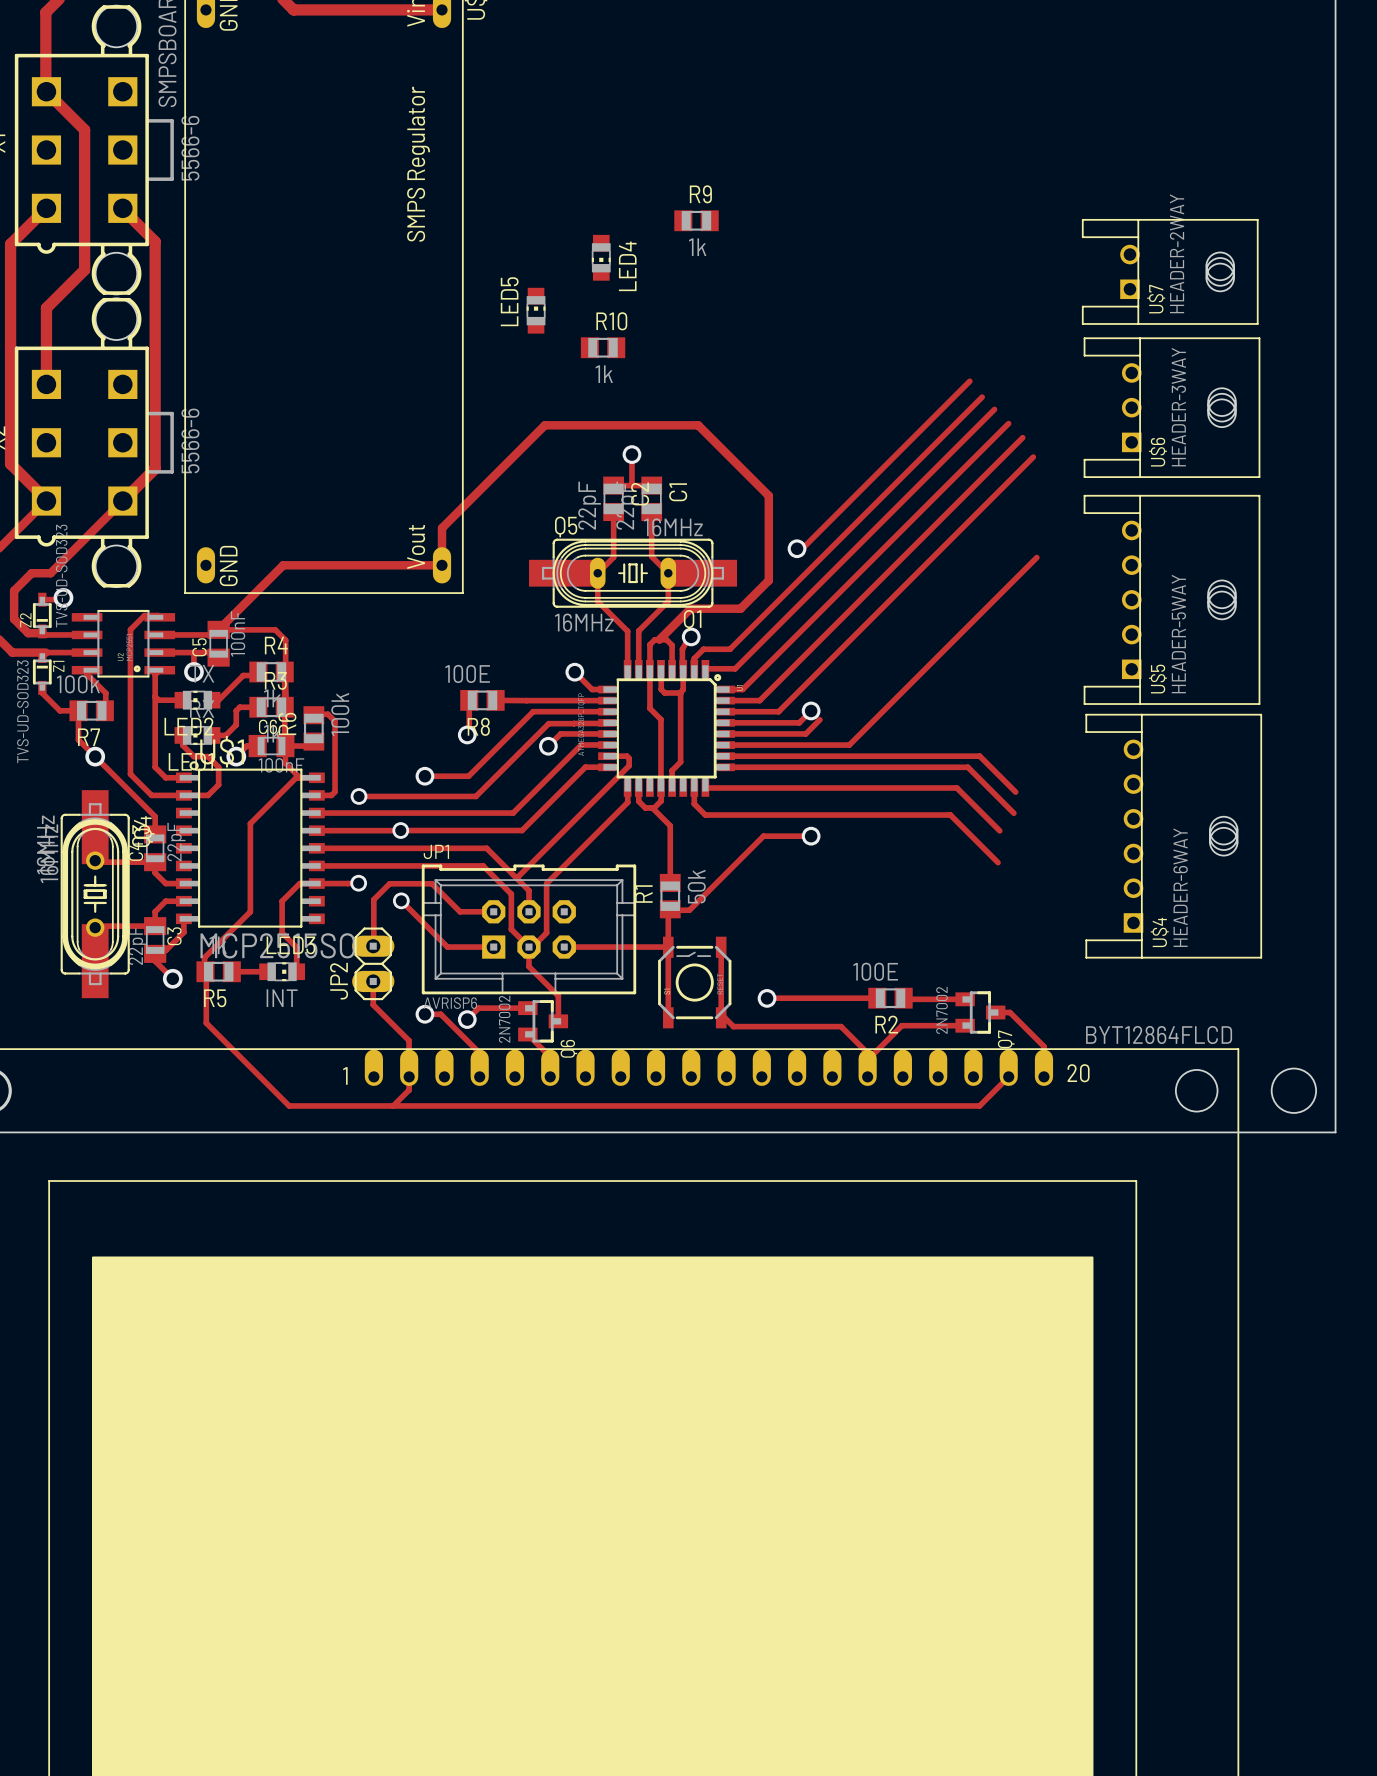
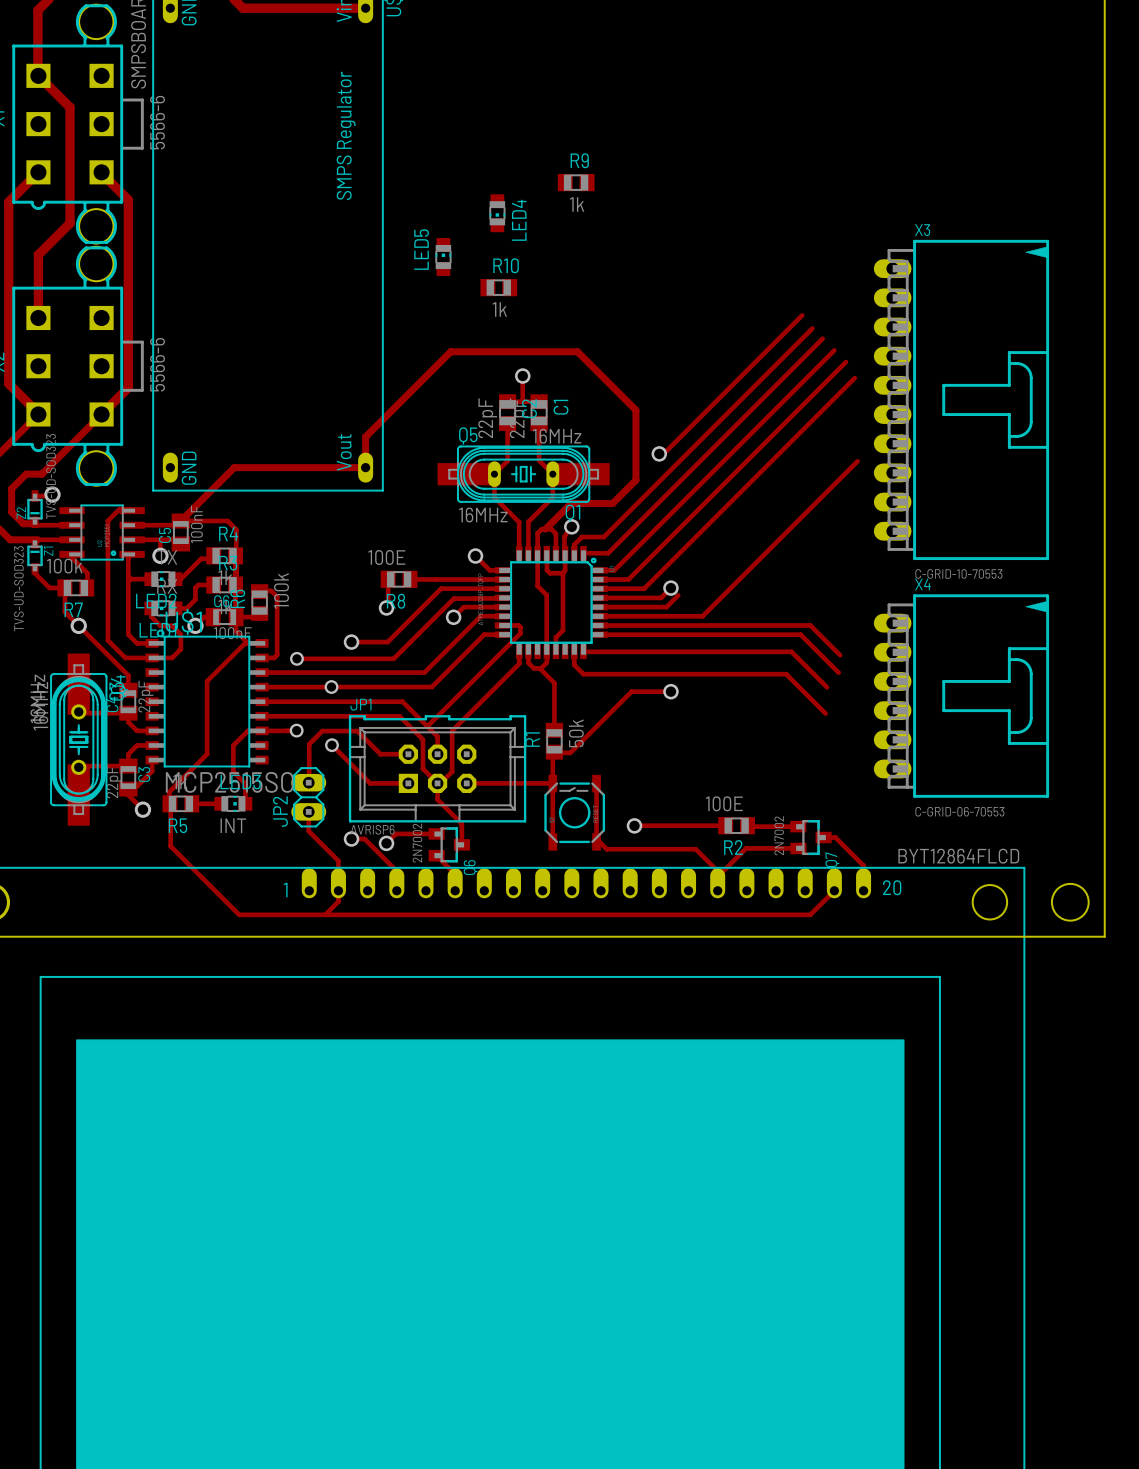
U$7: HEADER-2WAY (1170, 271) -> none
U$6: HEADER-3WAY (1172, 407) -> none
X3: none -> C-GRID-10-70553 (961, 399)
U$5: HEADER-5WAY (1172, 599) -> none
U$4: HEADER-6WAY (1173, 836) -> none
X4: none -> C-GRID-06-70553 (961, 696)

